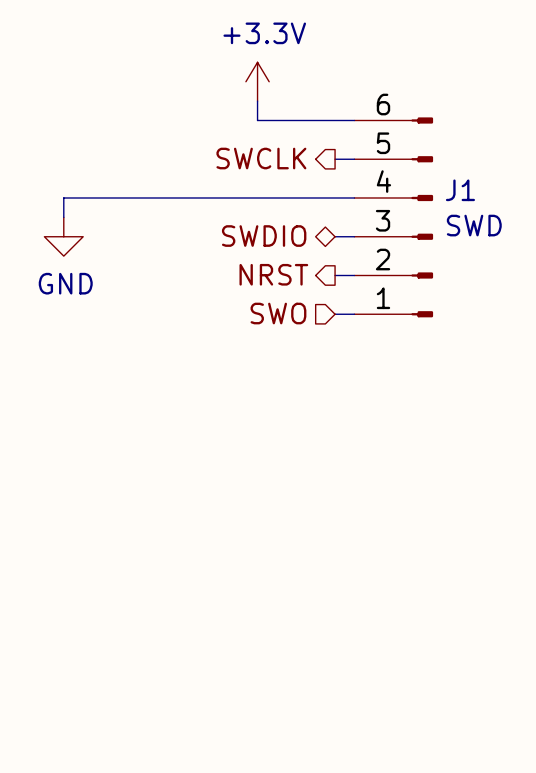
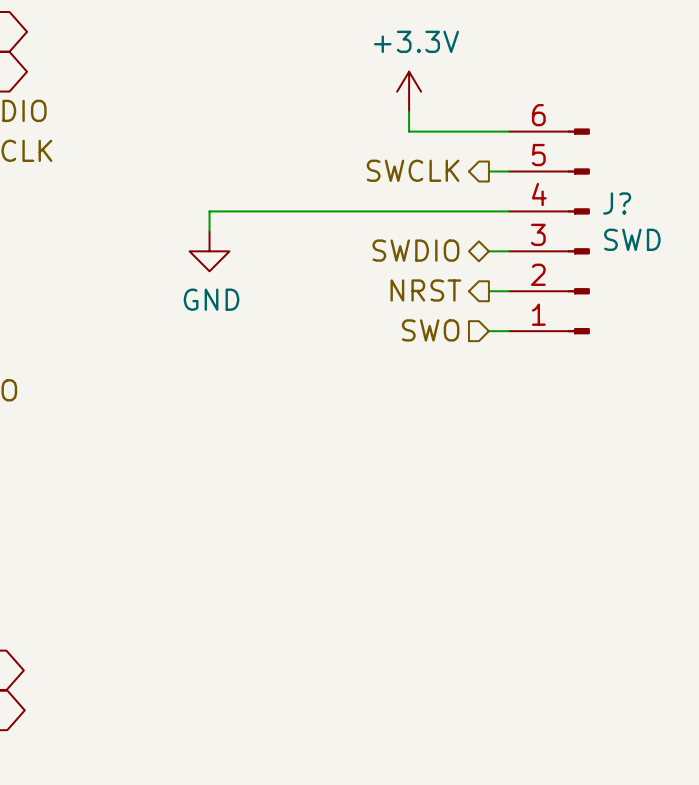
J1 name: J1 (460, 190) -> J? (617, 203)

